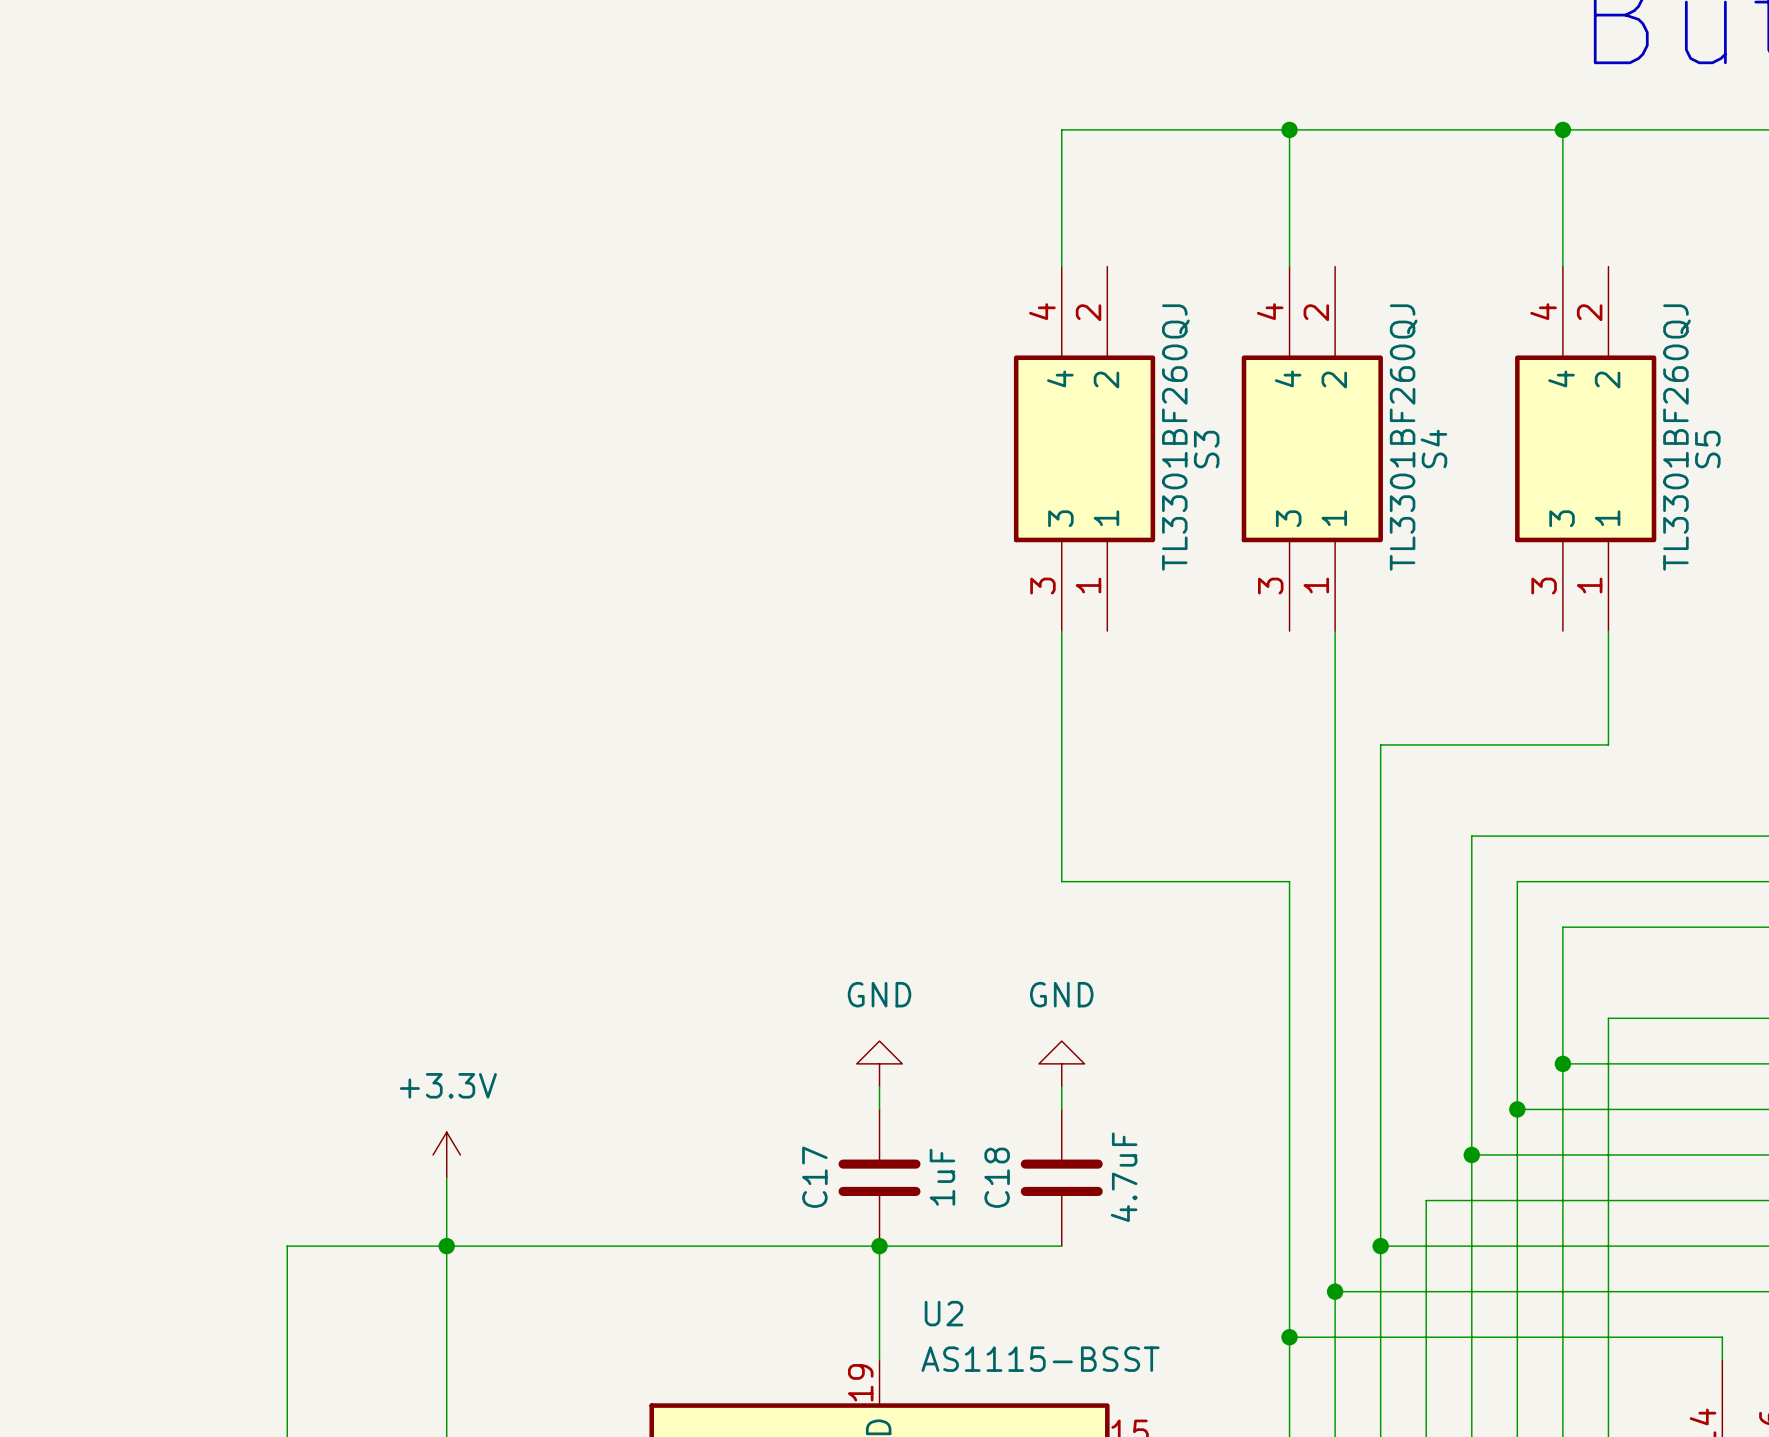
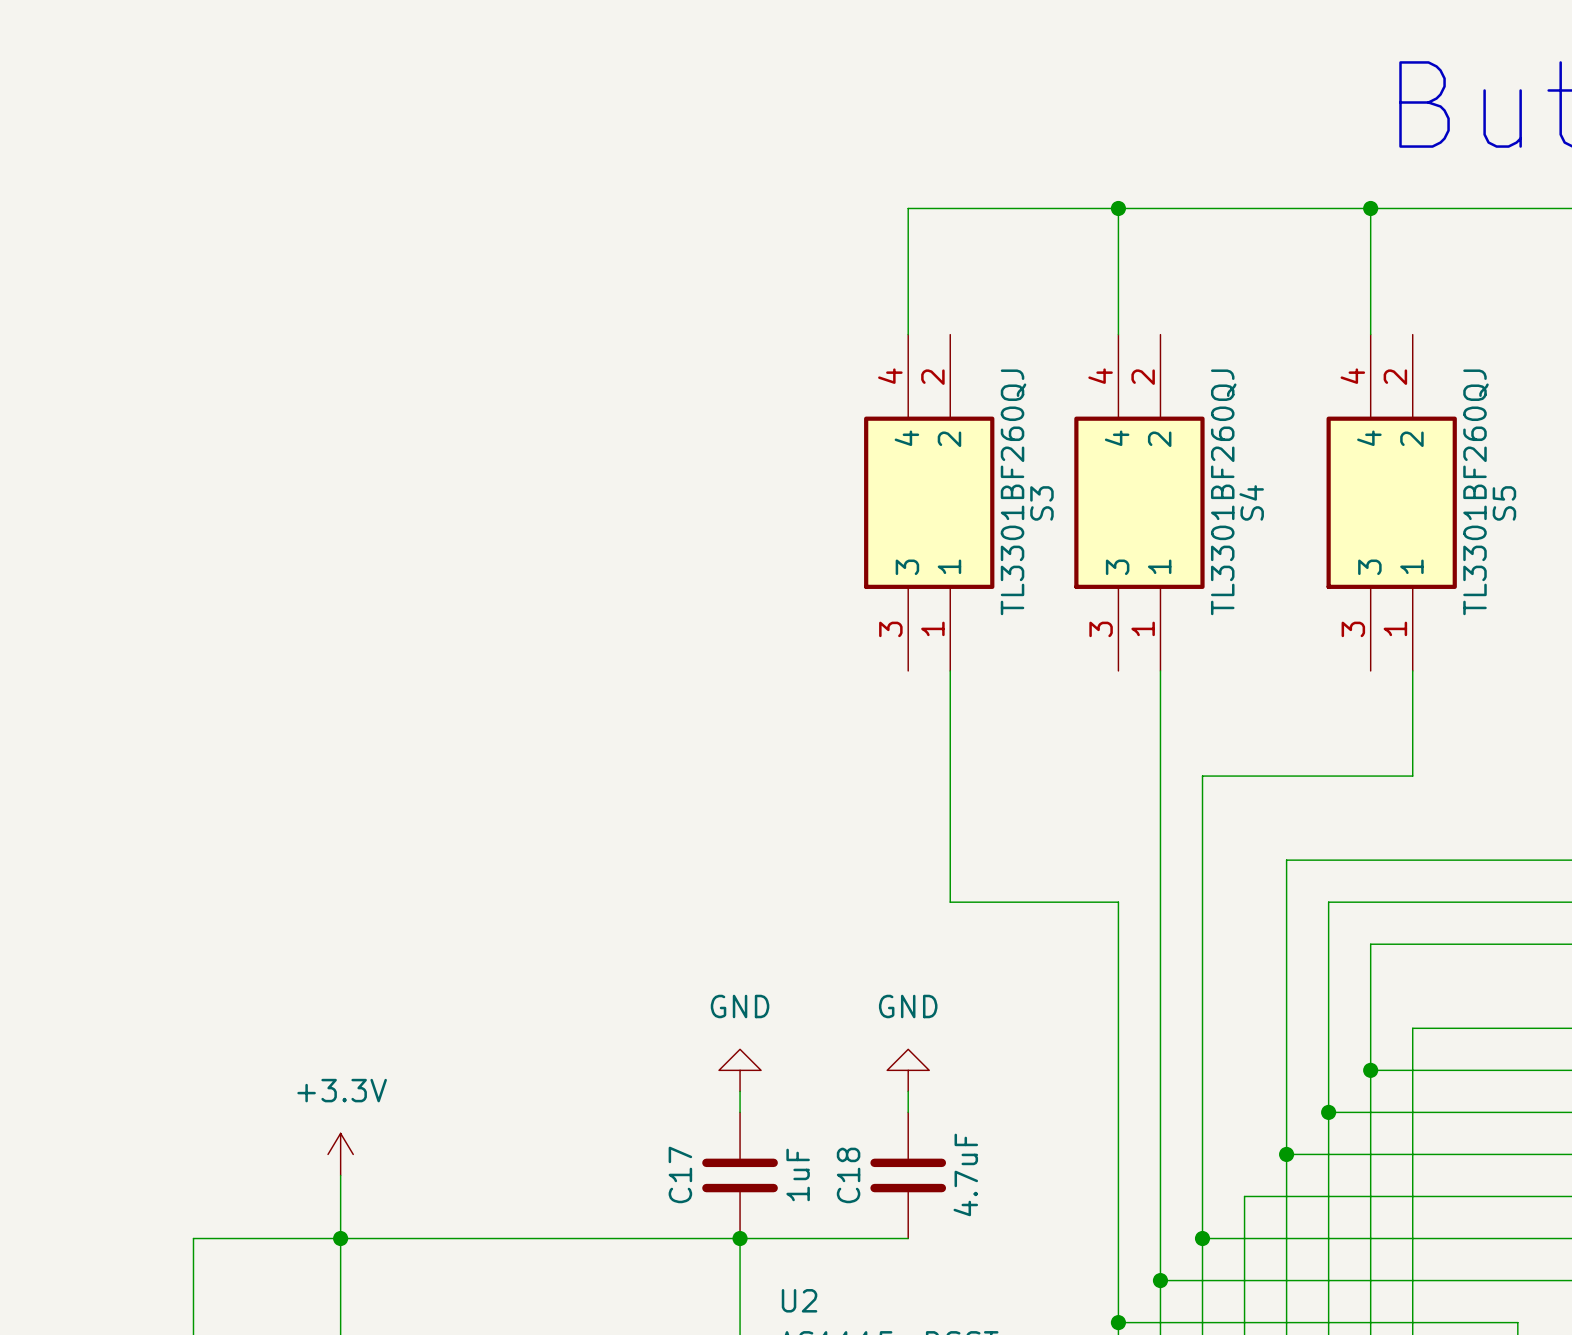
wire: (1061, 631) (1061, 881) (1107, 881) -> (950, 670) (950, 902)

